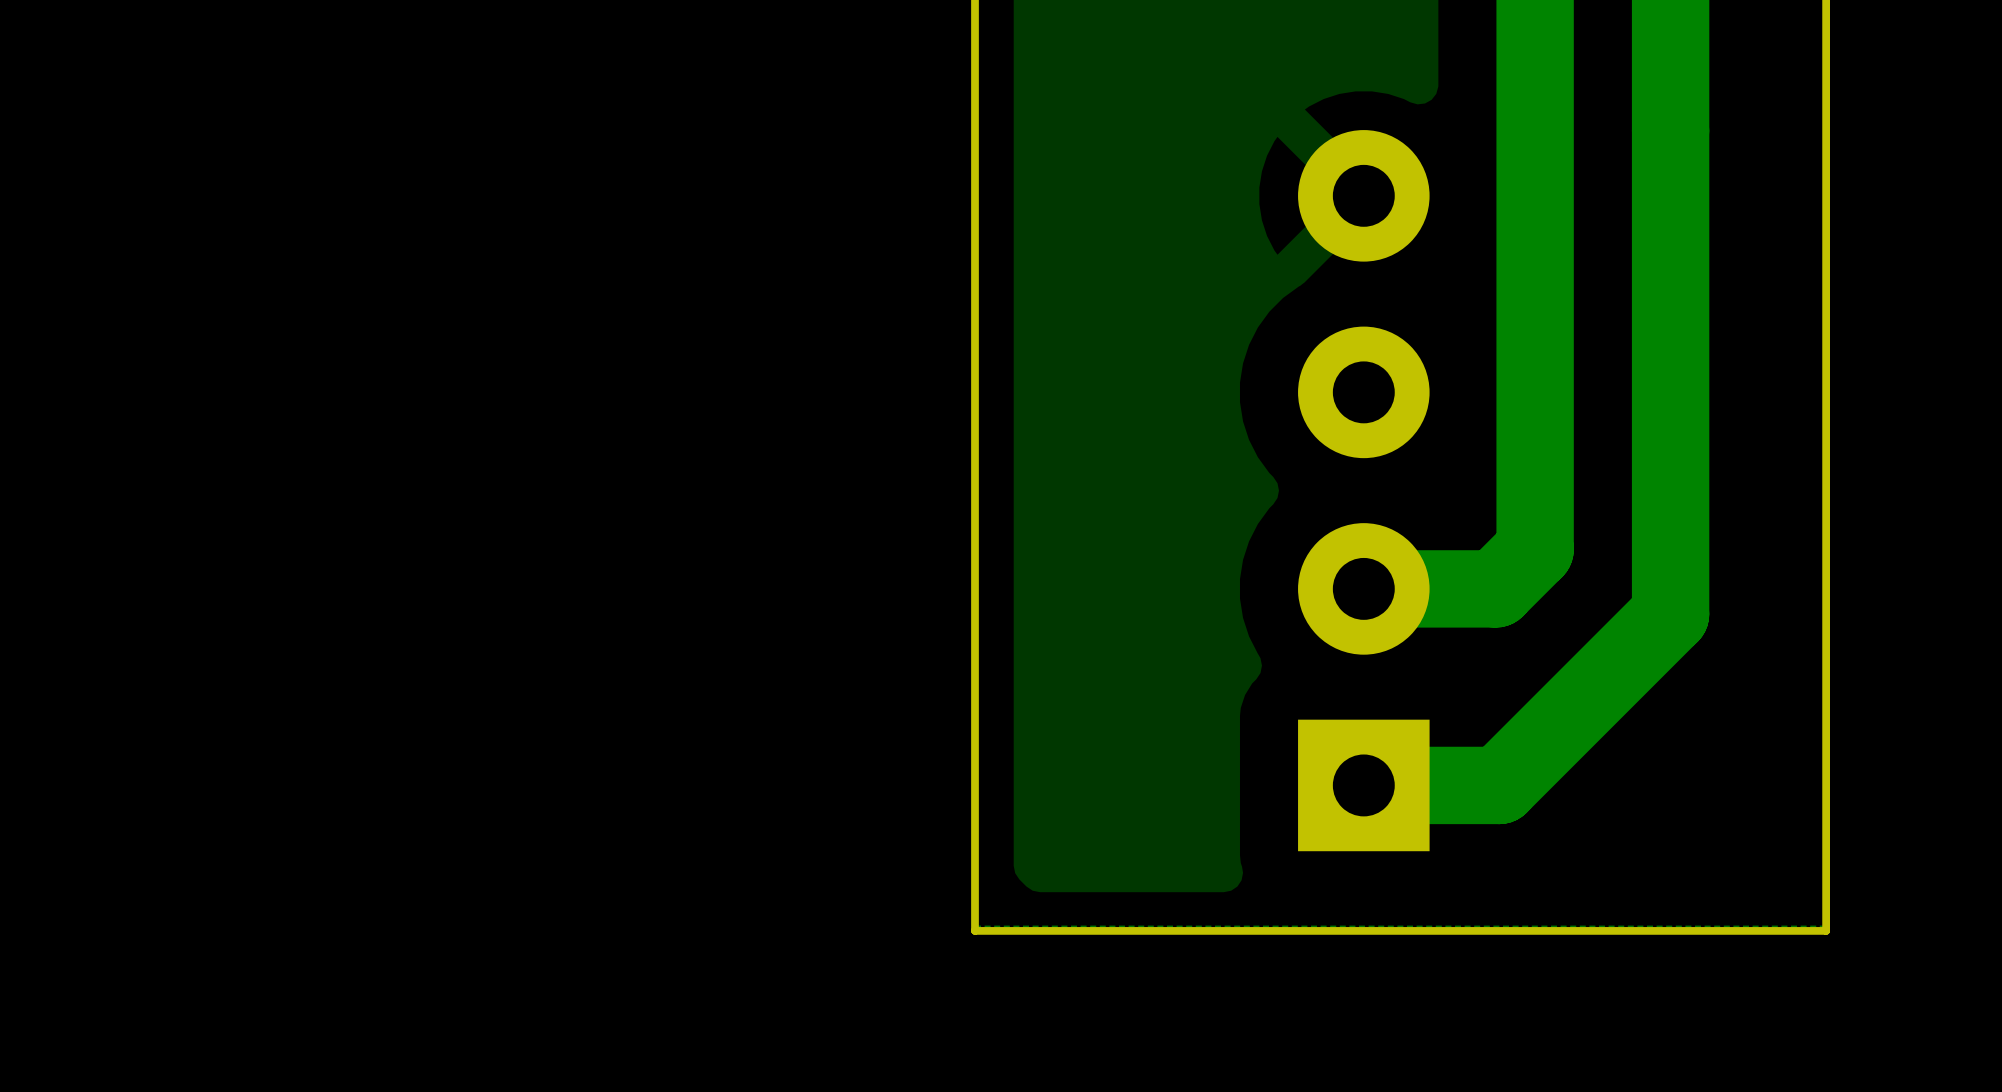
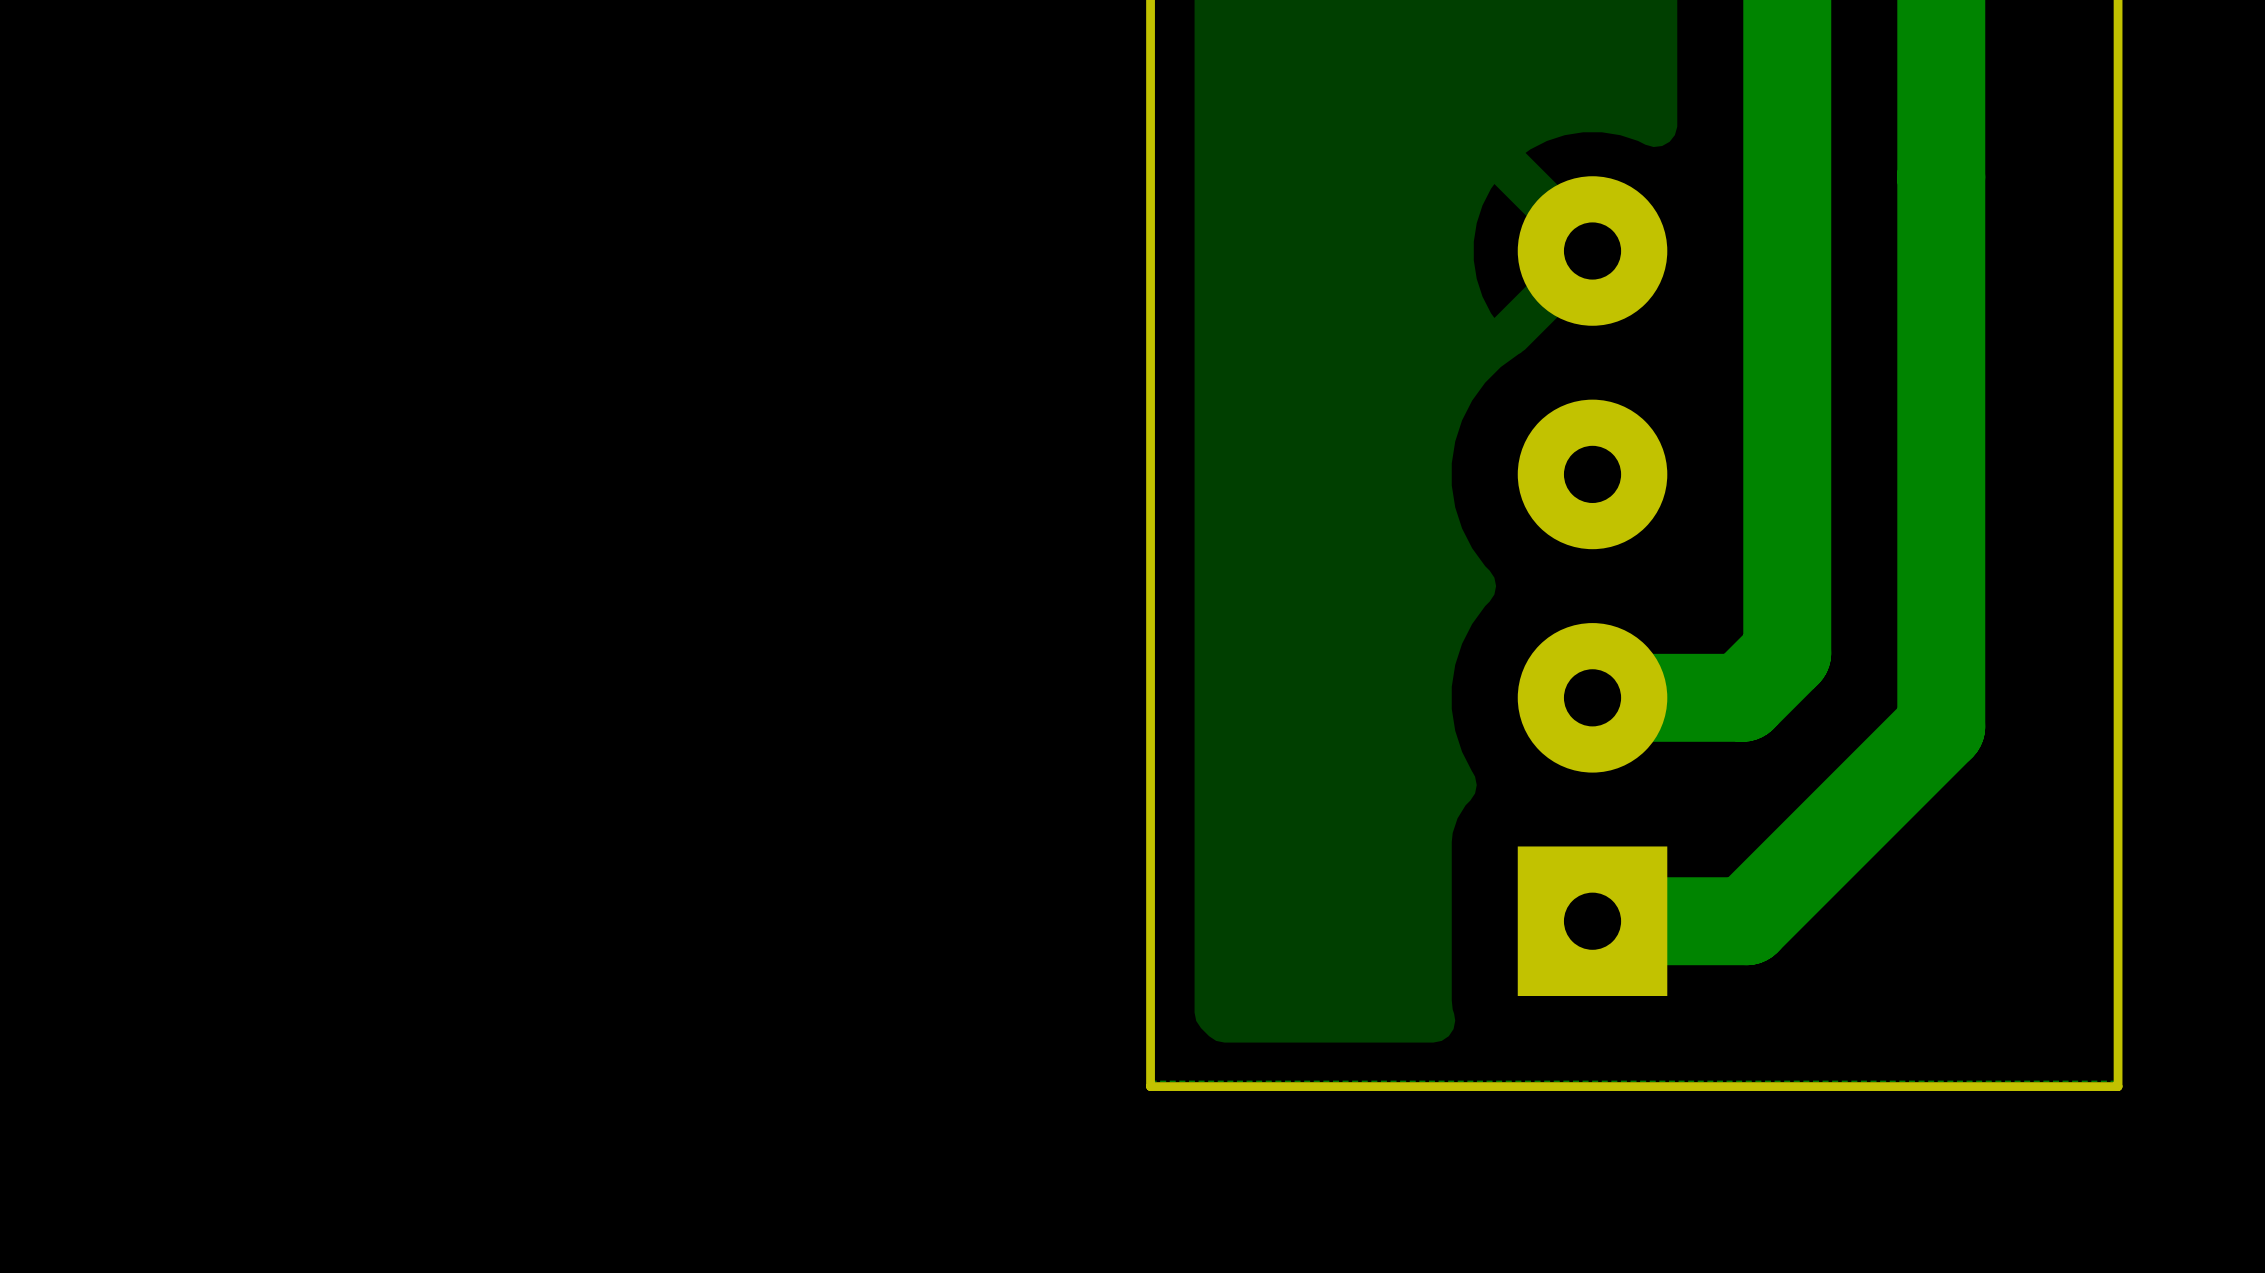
part footprint: [1298, 130, 1430, 852] -> [1517, 176, 1668, 996]

